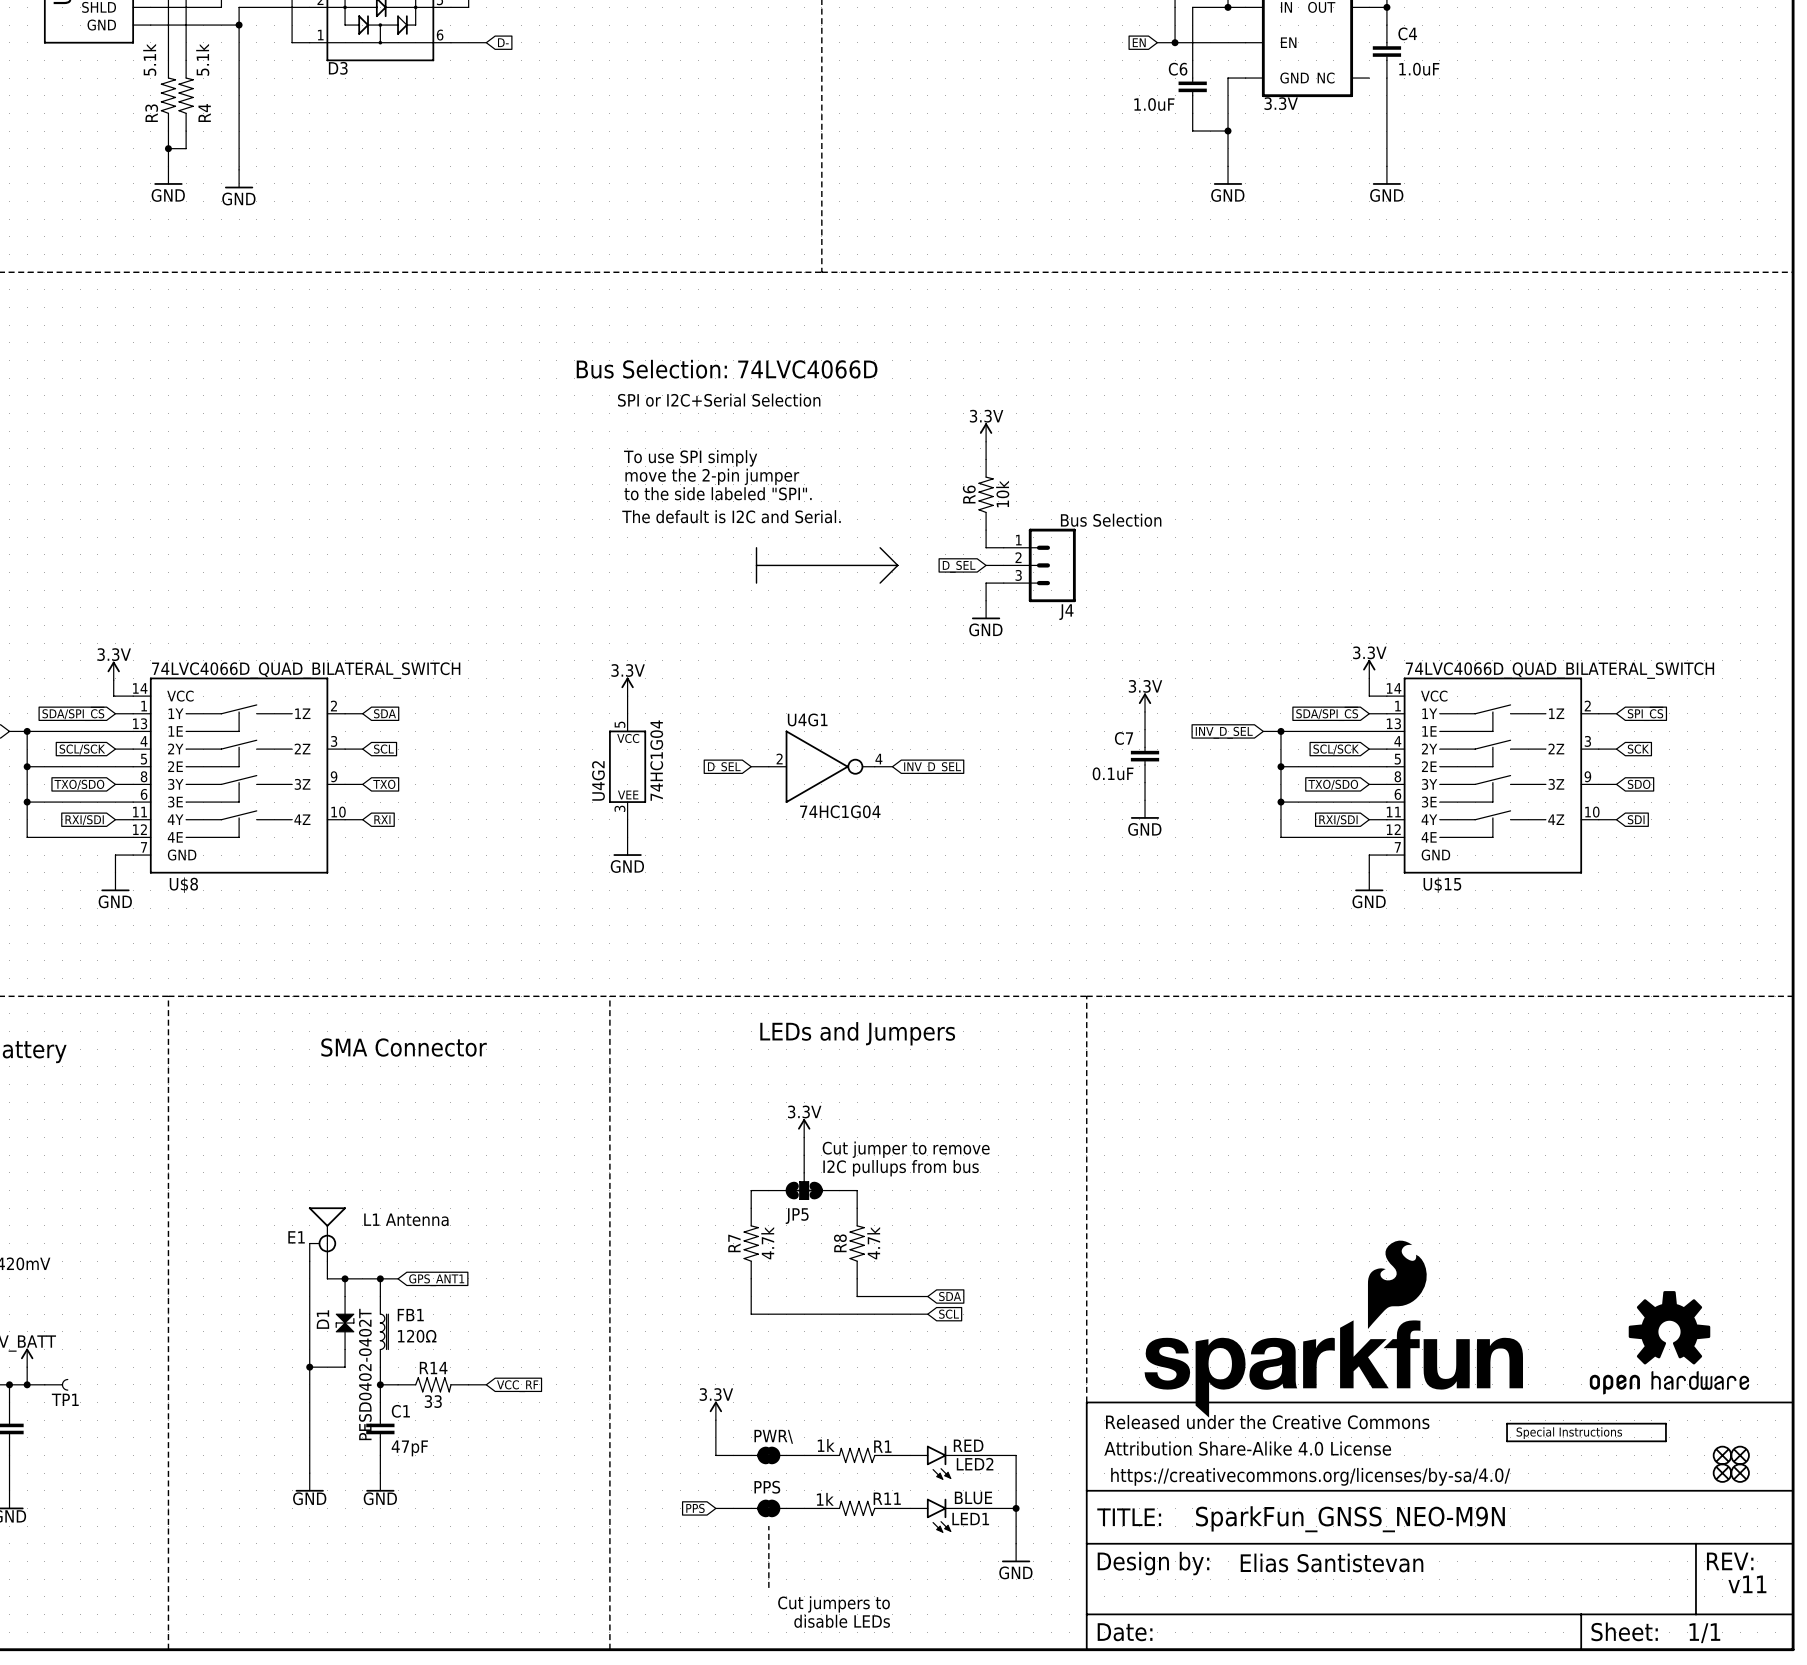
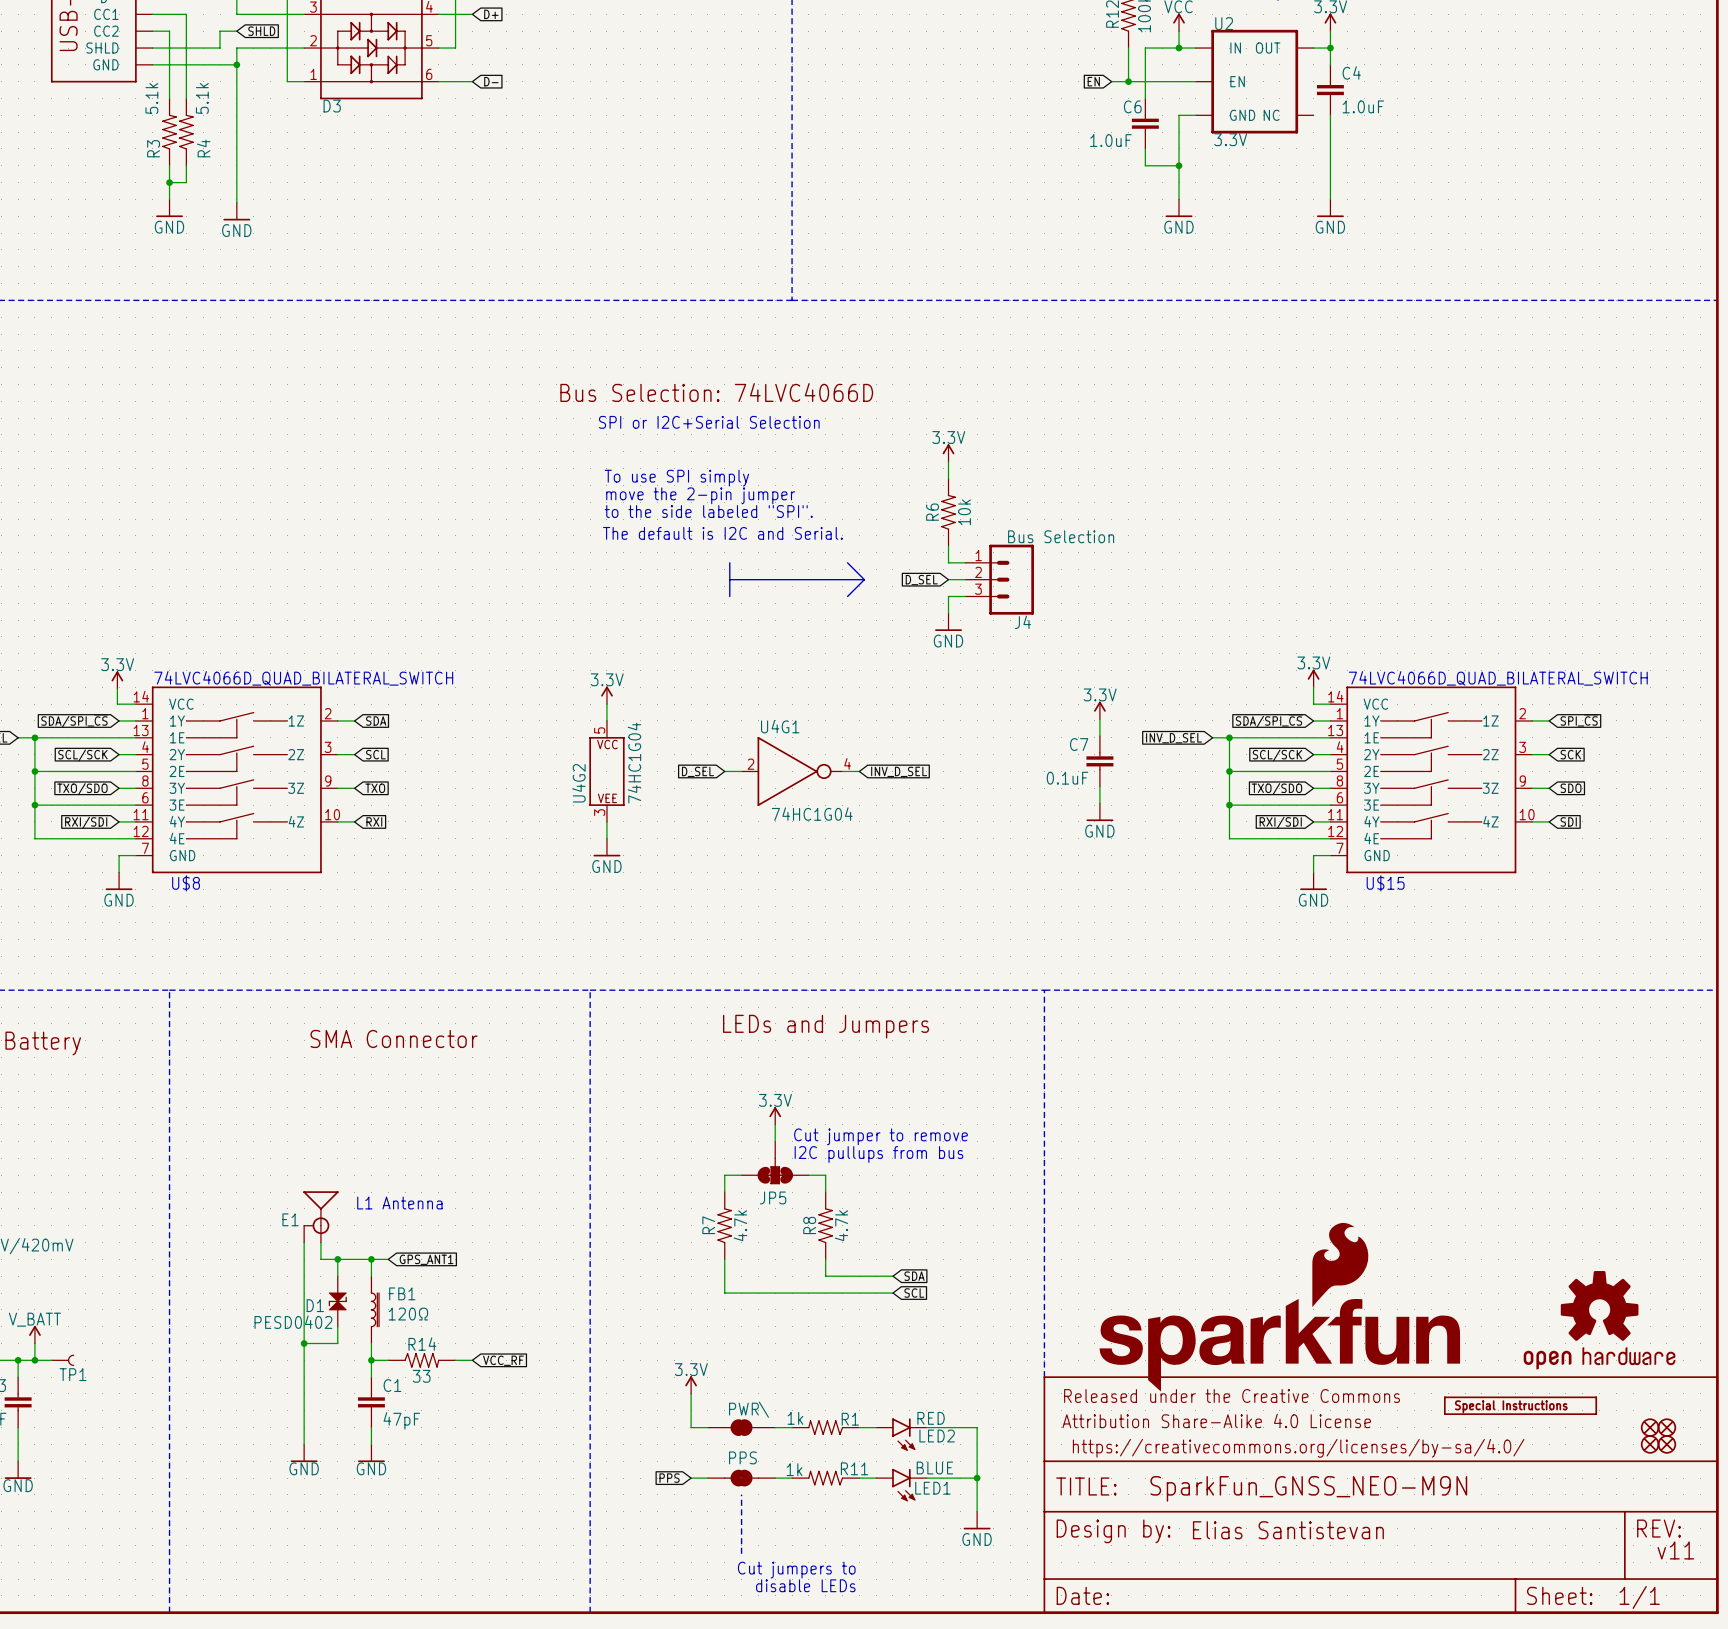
D1 name rotation: 0° (322, 1319) -> 90° clockwise (315, 1305)
D1 value: PESD0402-0402T (365, 1374) -> PESD0402 (293, 1322)

